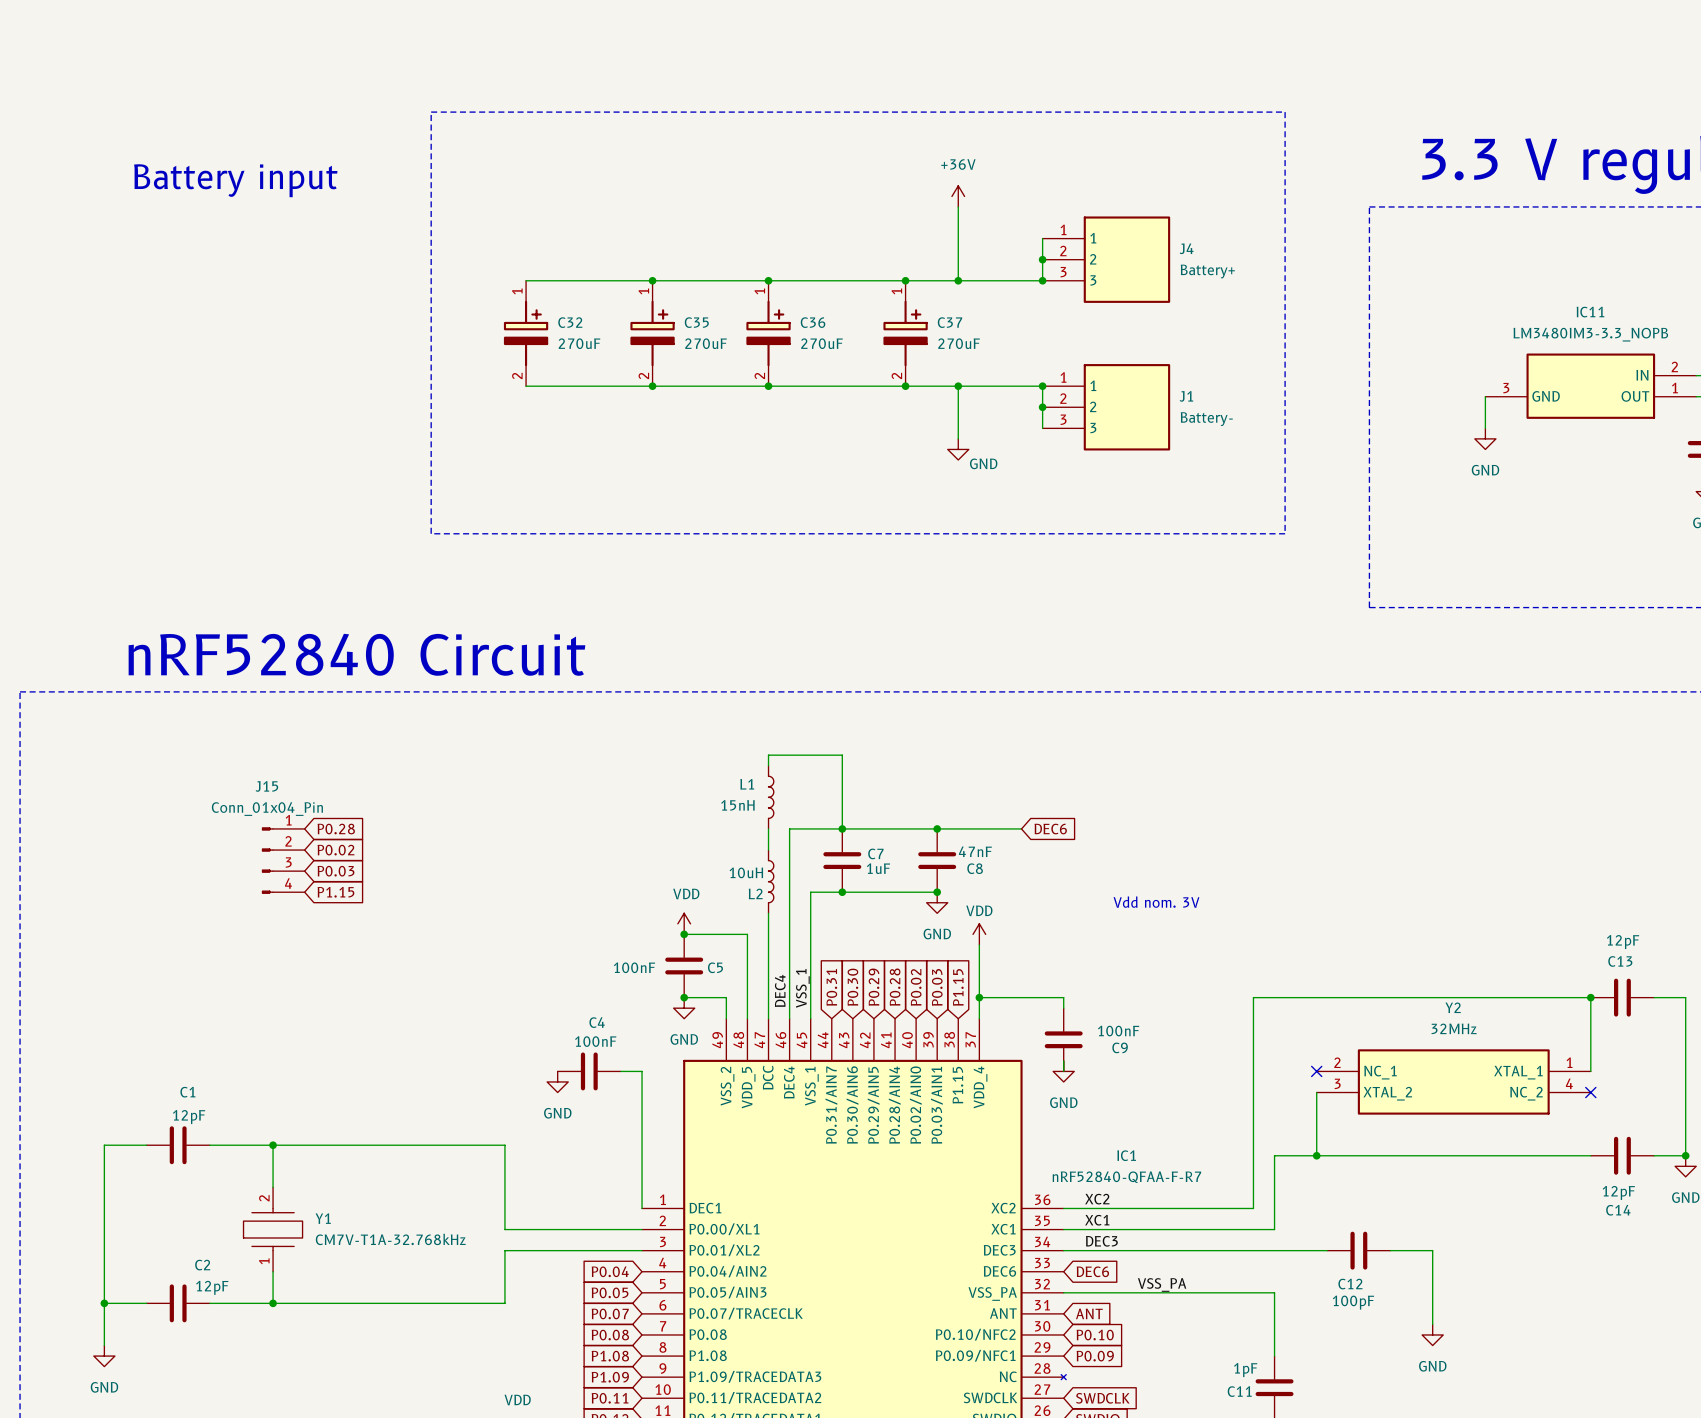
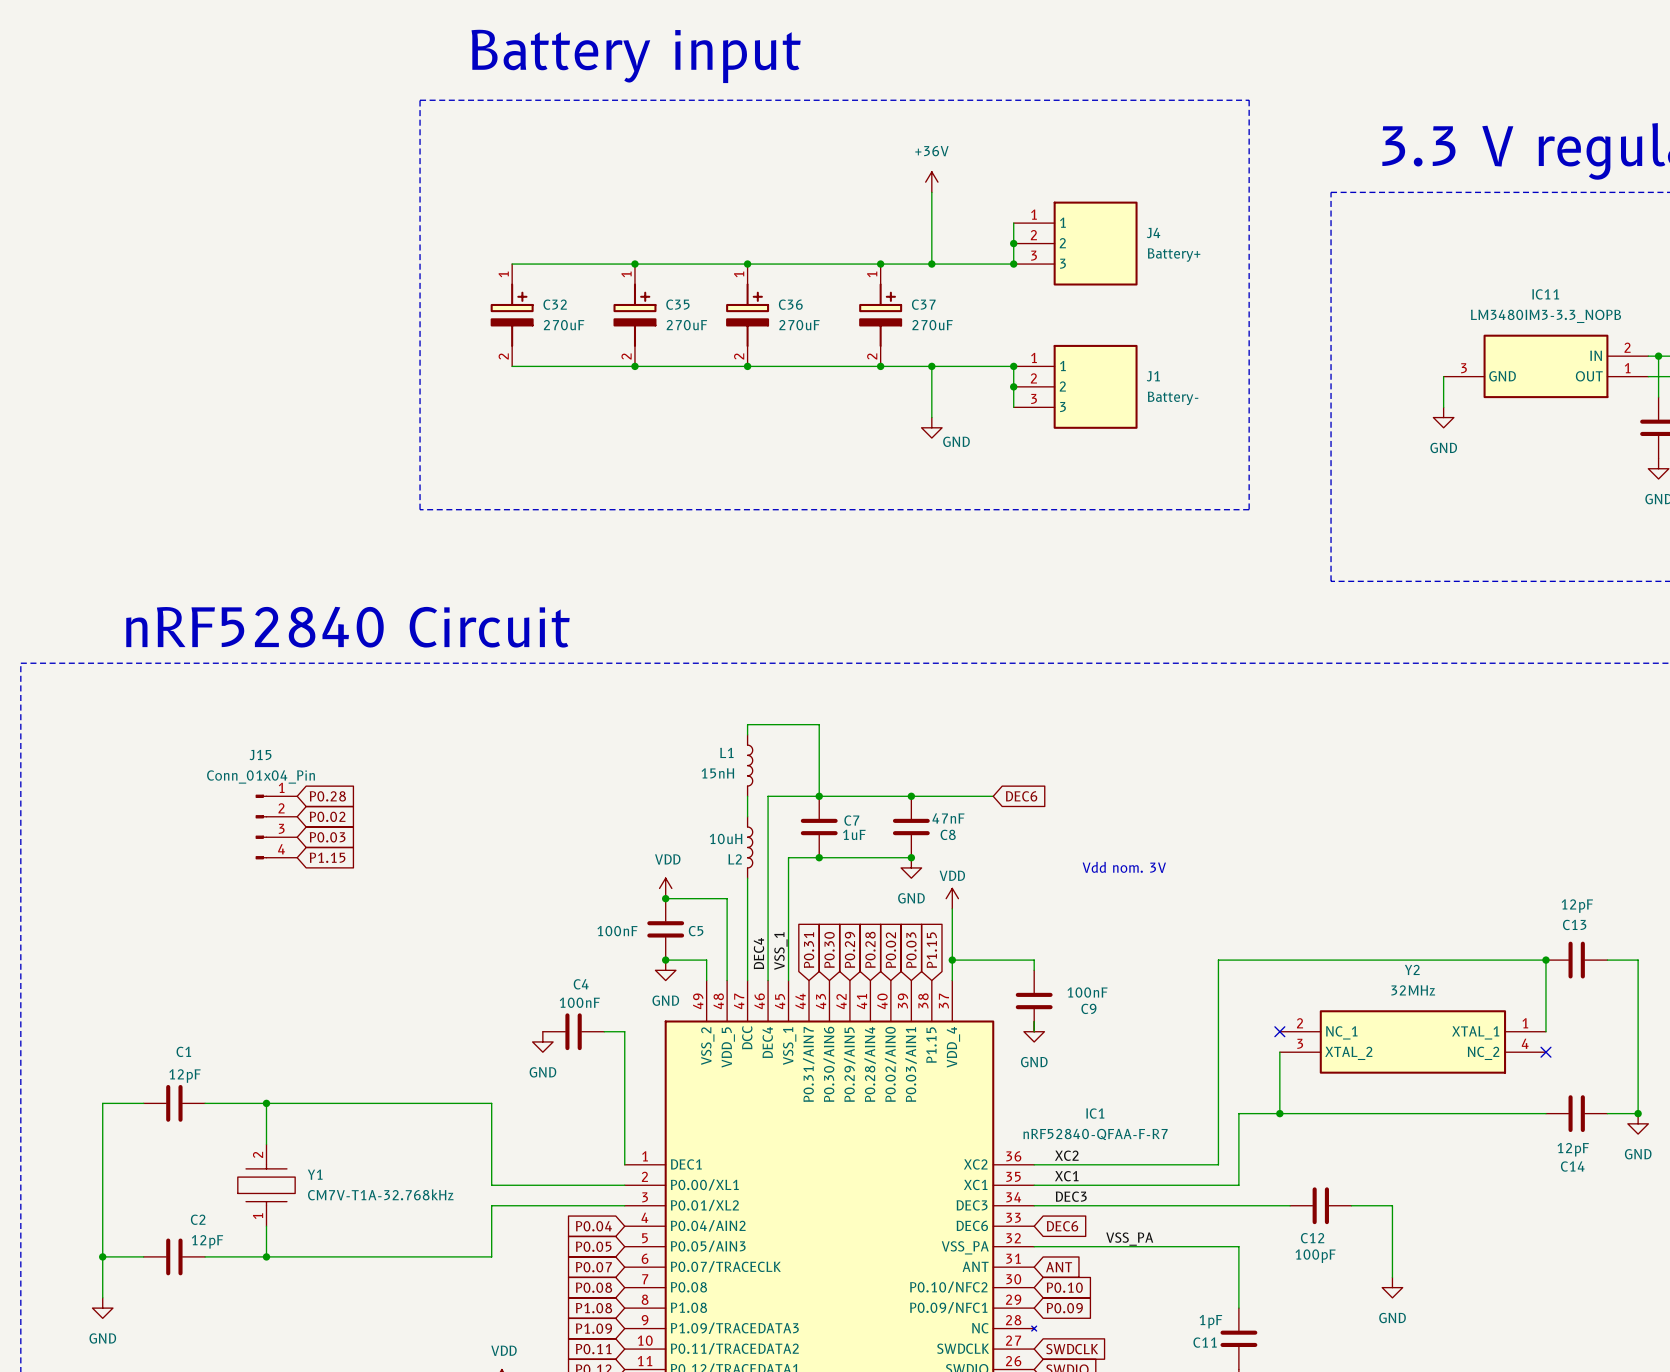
text: none -> Battery input (636, 56)
text: Battery input (235, 180) -> none

